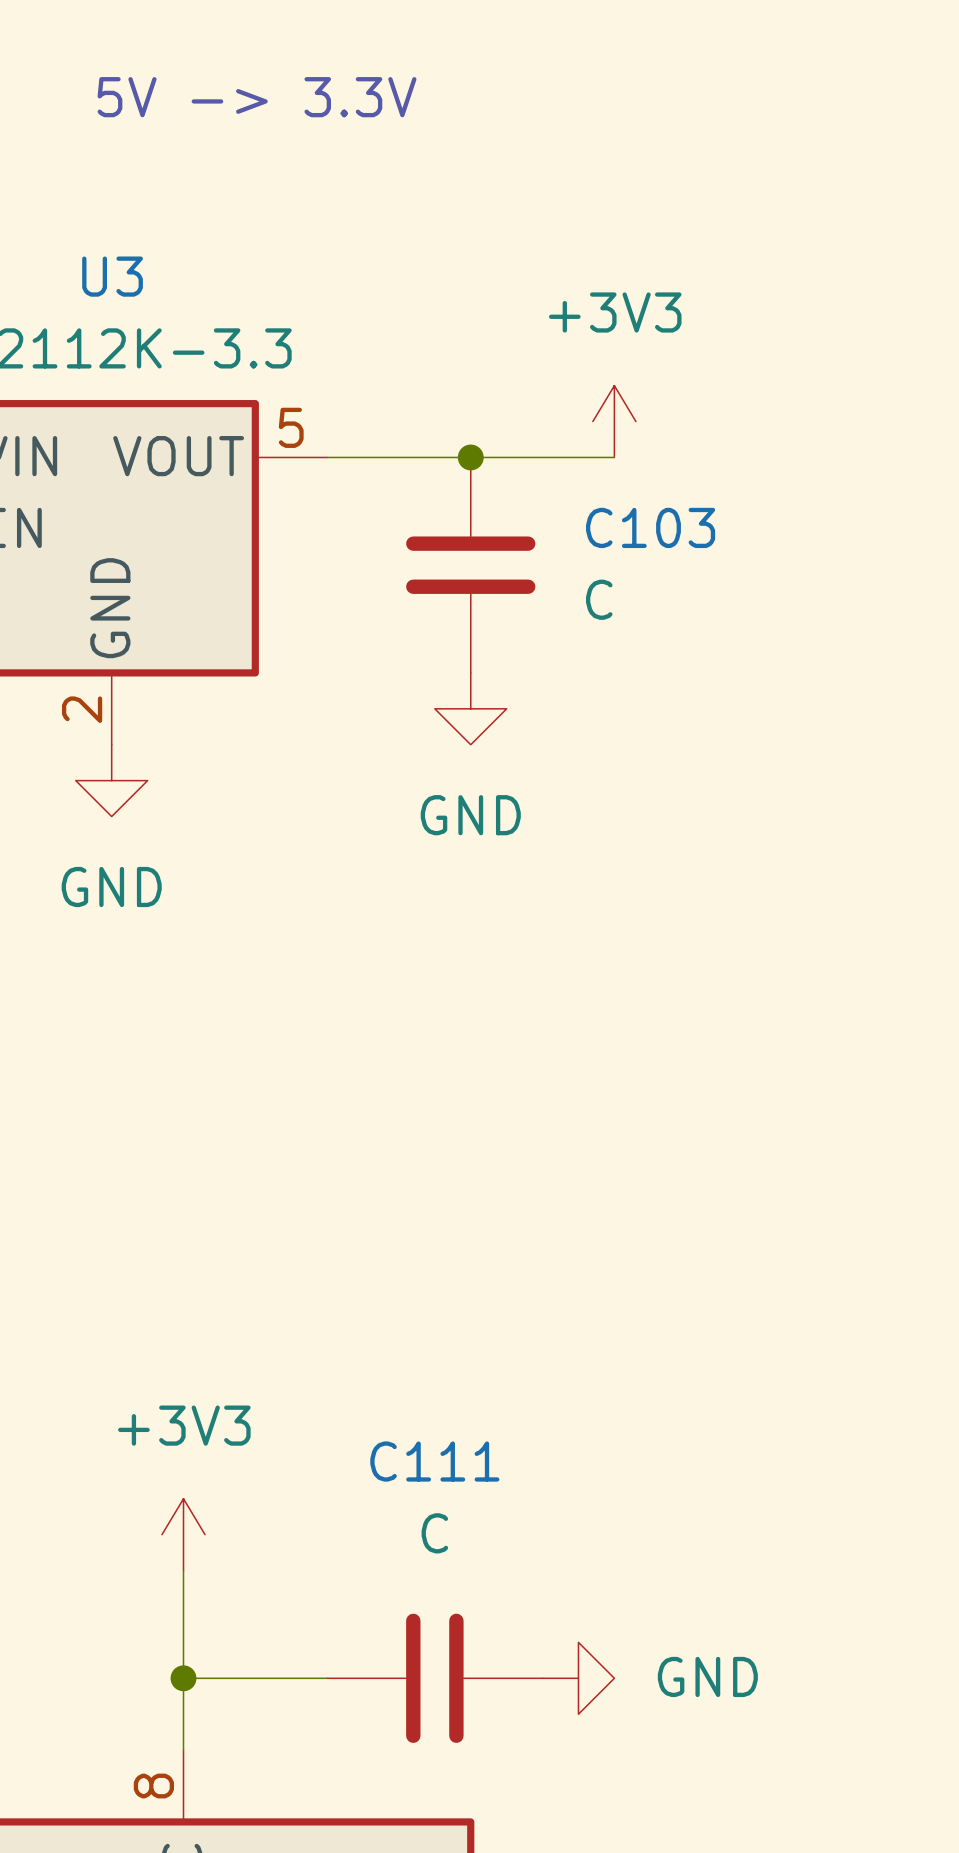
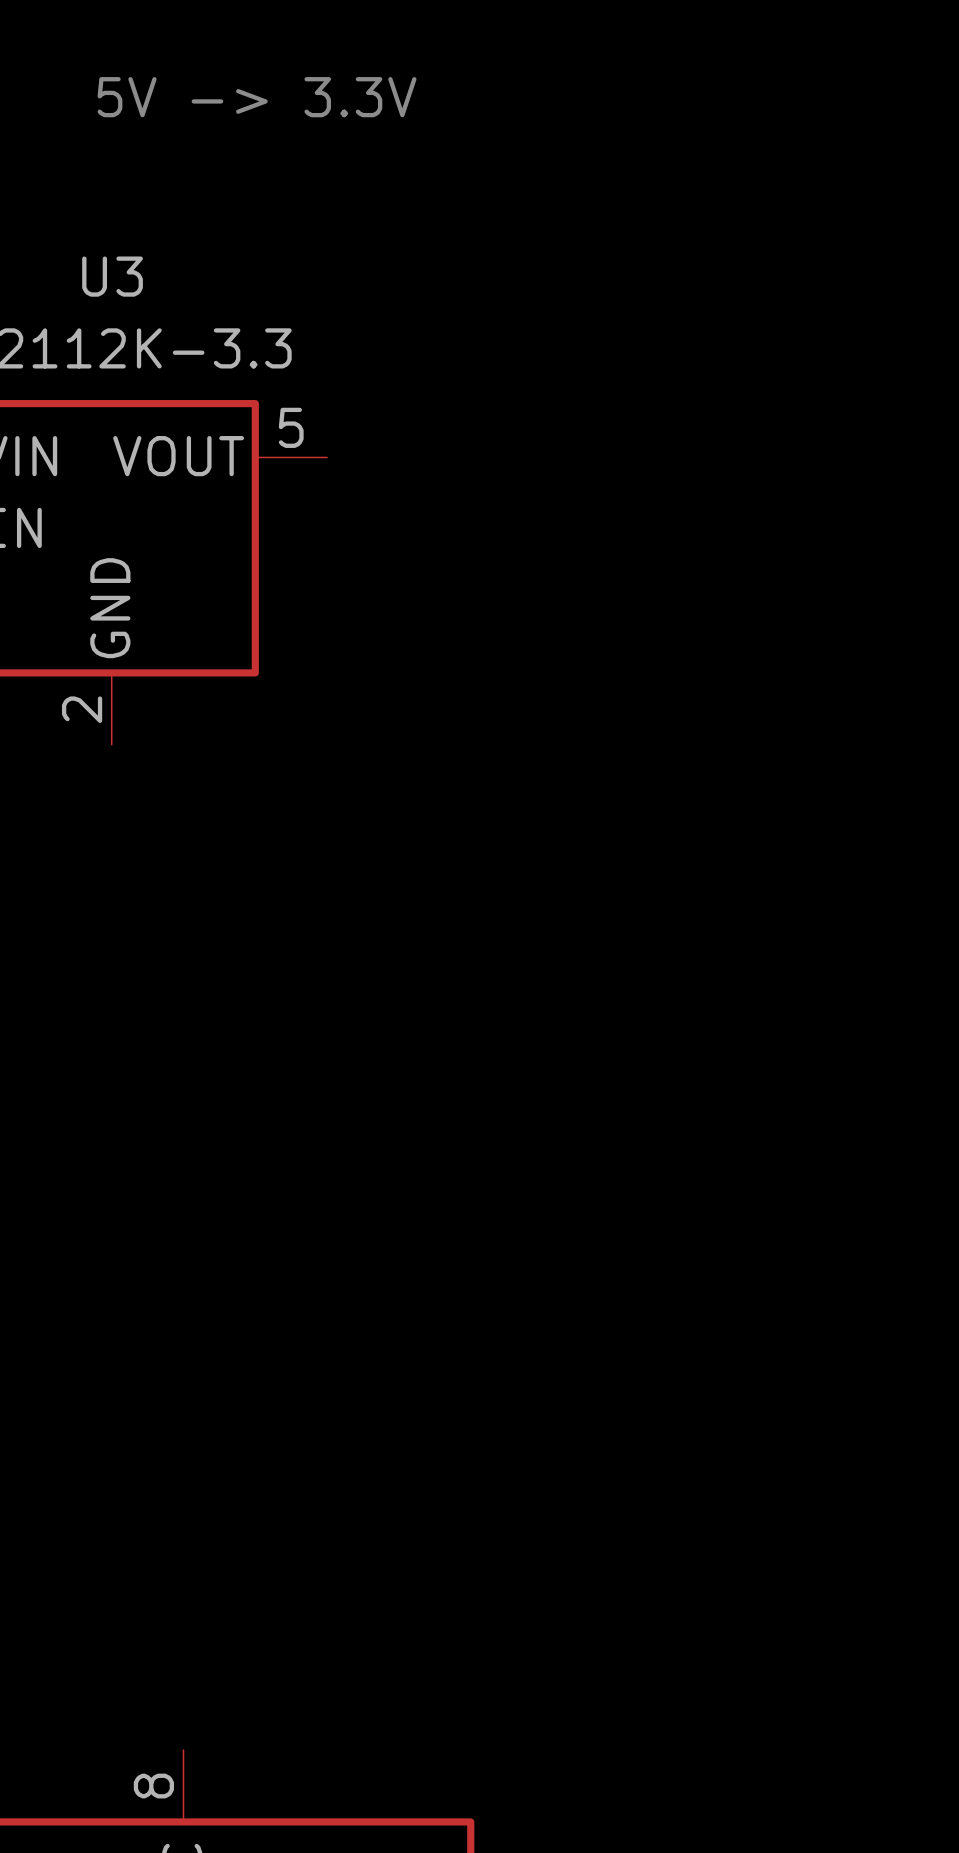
power symbol: +3V3 (614, 421) -> none
wire: (327, 457) (614, 457) -> none
junction: (470, 457) -> none
C103: C (470, 565) -> none
power symbol: GND (470, 708) -> none
power symbol: GND (111, 780) -> none
power symbol: +3V3 (183, 1534) -> none
wire: (183, 1570) (183, 1750) -> none
wire: (183, 1678) (327, 1678) -> none
junction: (183, 1678) -> none
C111: C (434, 1678) -> none
power symbol: GND (578, 1678) -> none

